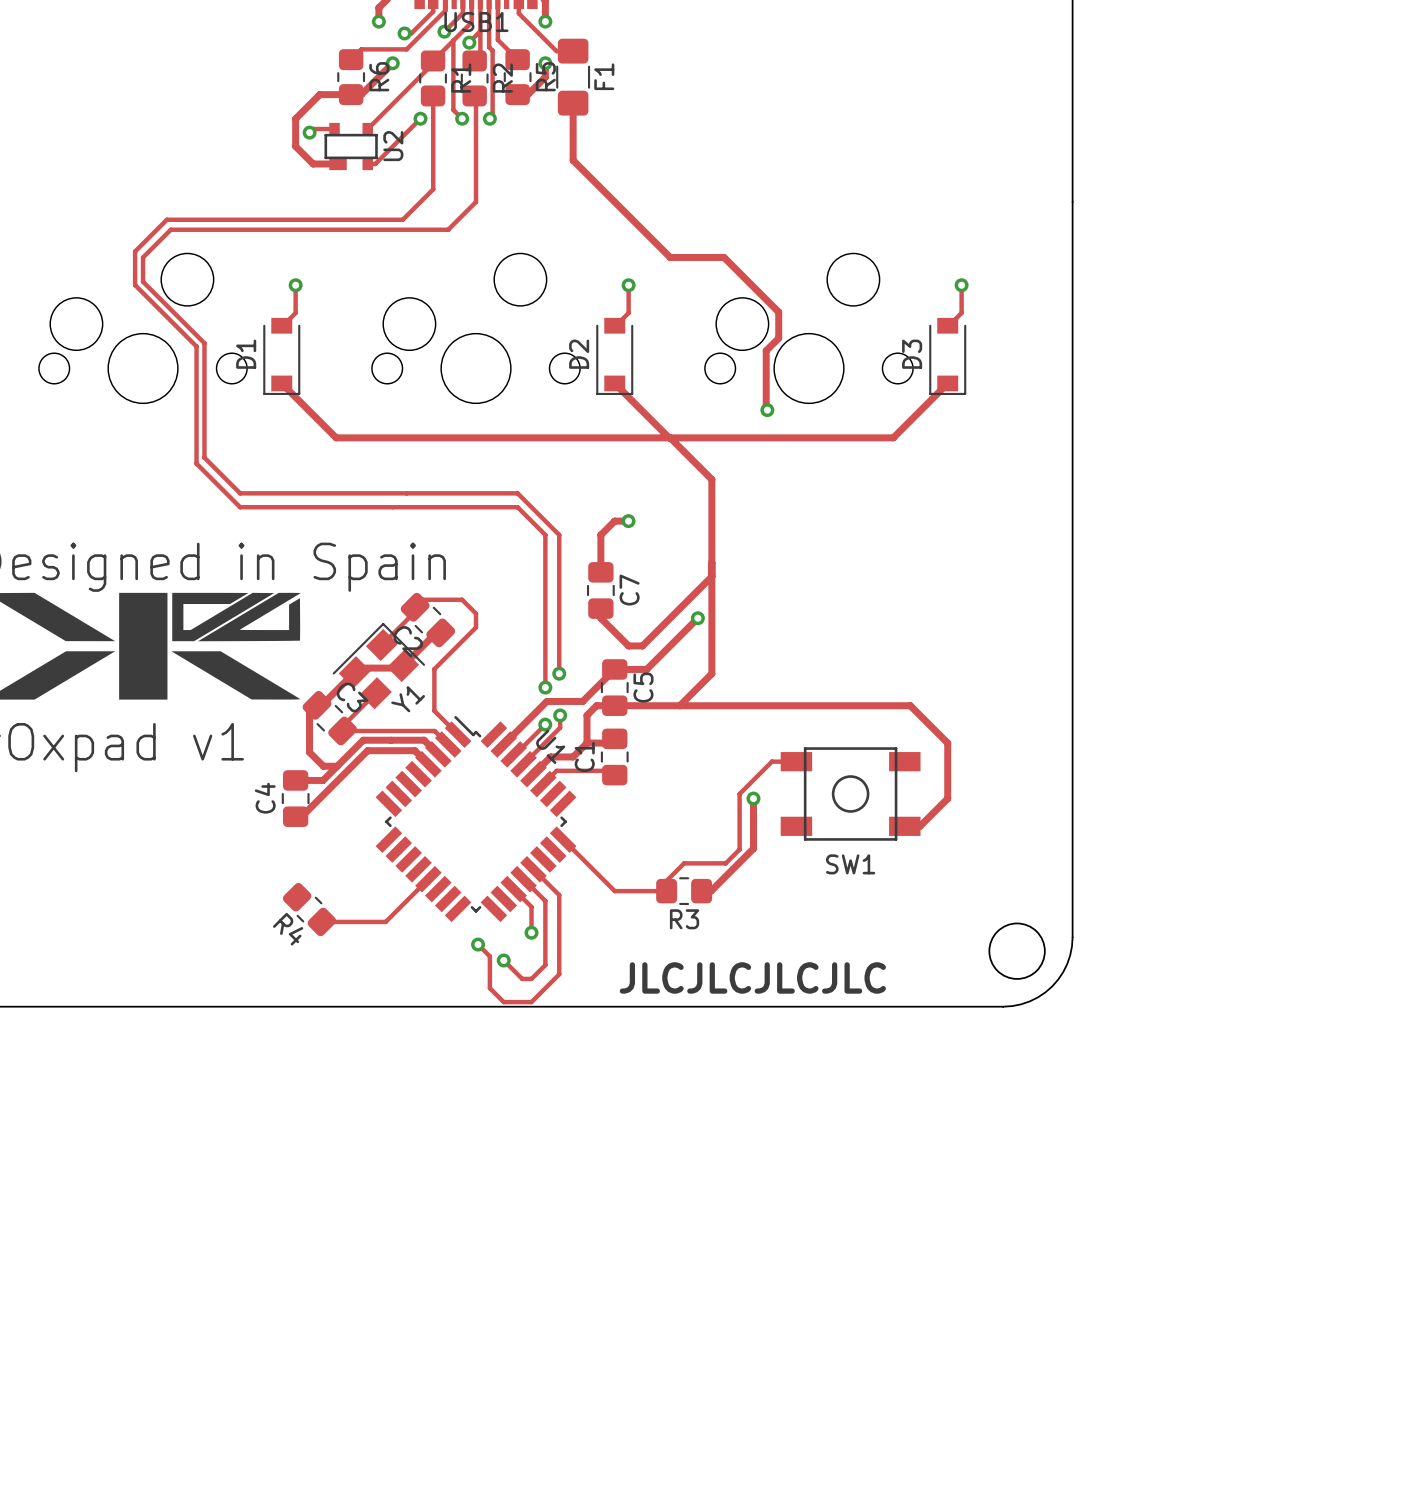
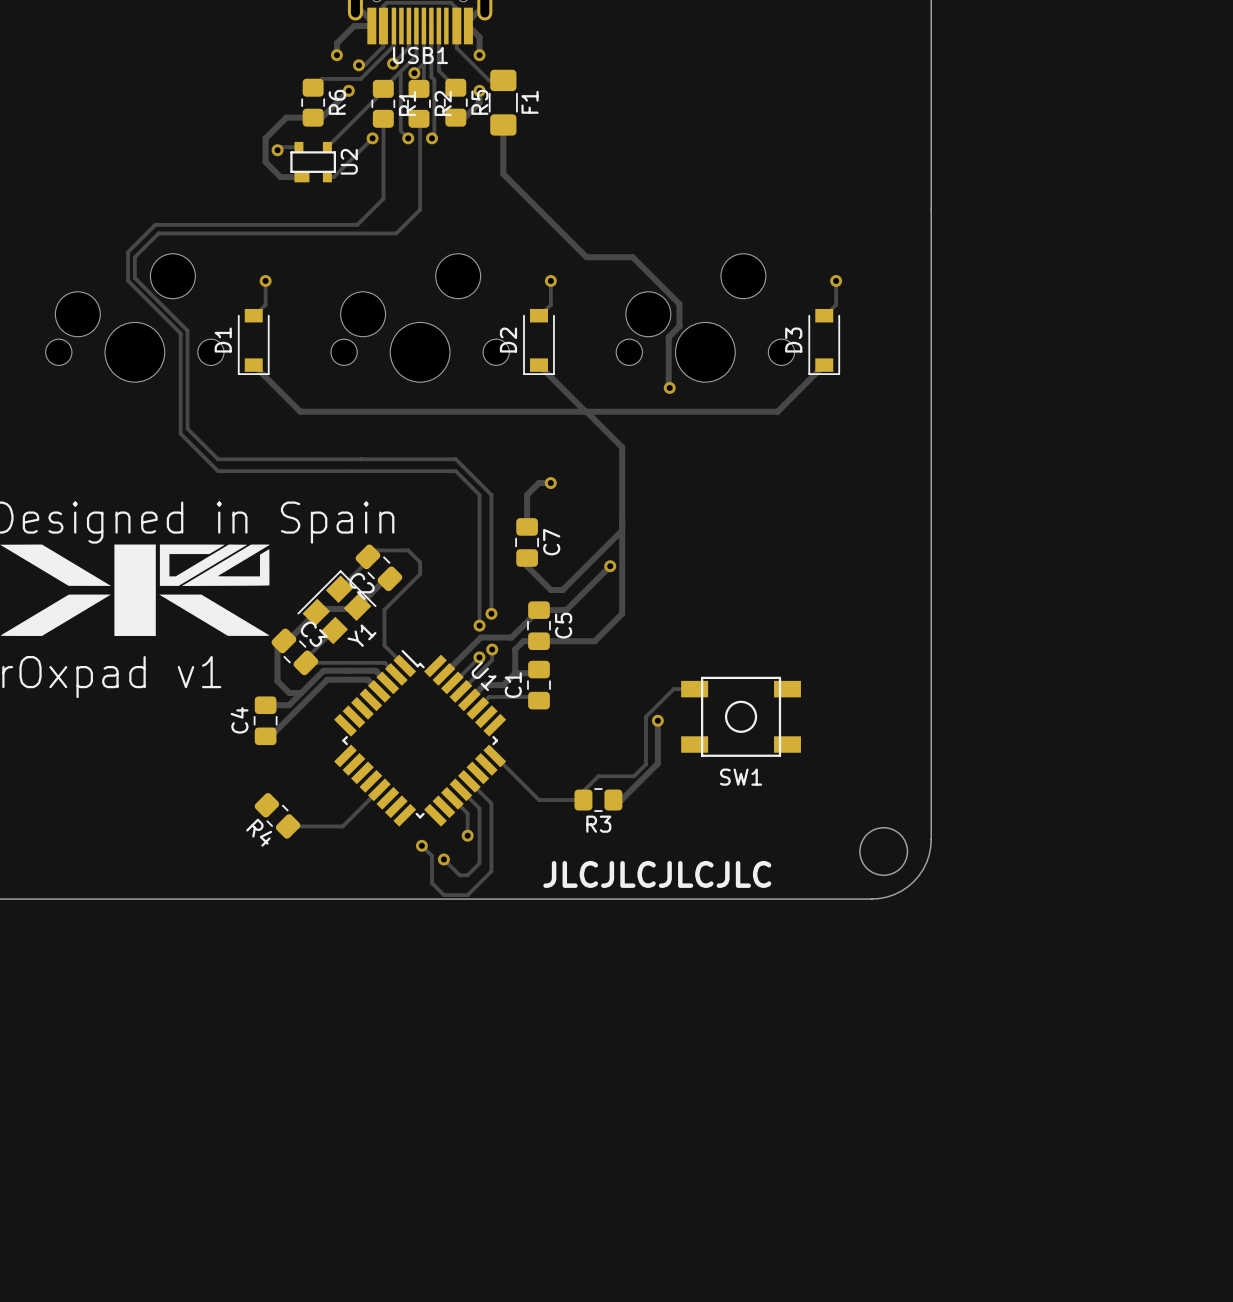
track: (679, 705) (910, 705) (947, 743) (947, 798) (919, 826) (904, 826) -> none

